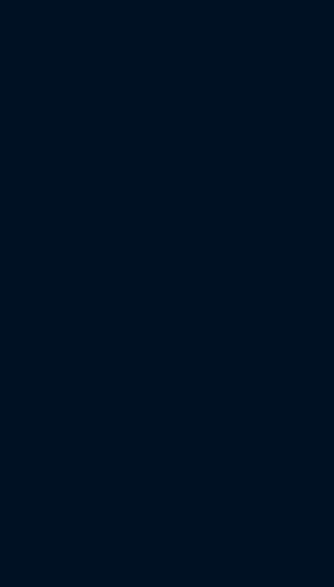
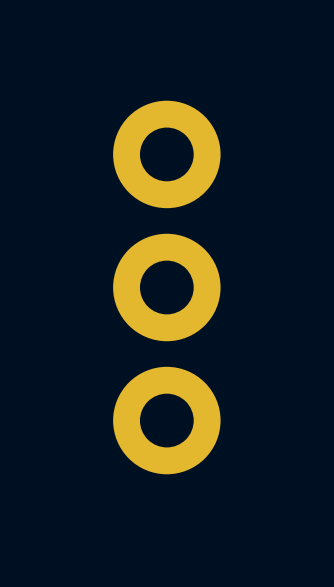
part: none -> (166, 154)
part: none -> (166, 287)
part: none -> (166, 420)

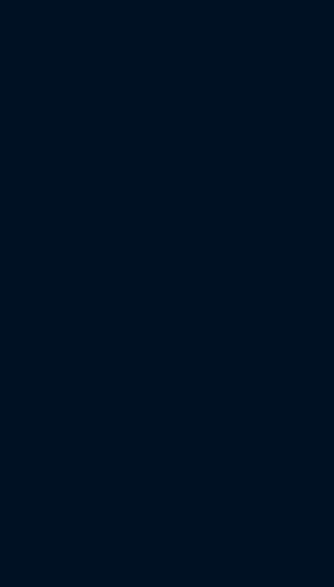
part: (166, 154) -> none
part: (166, 287) -> none
part: (166, 420) -> none

